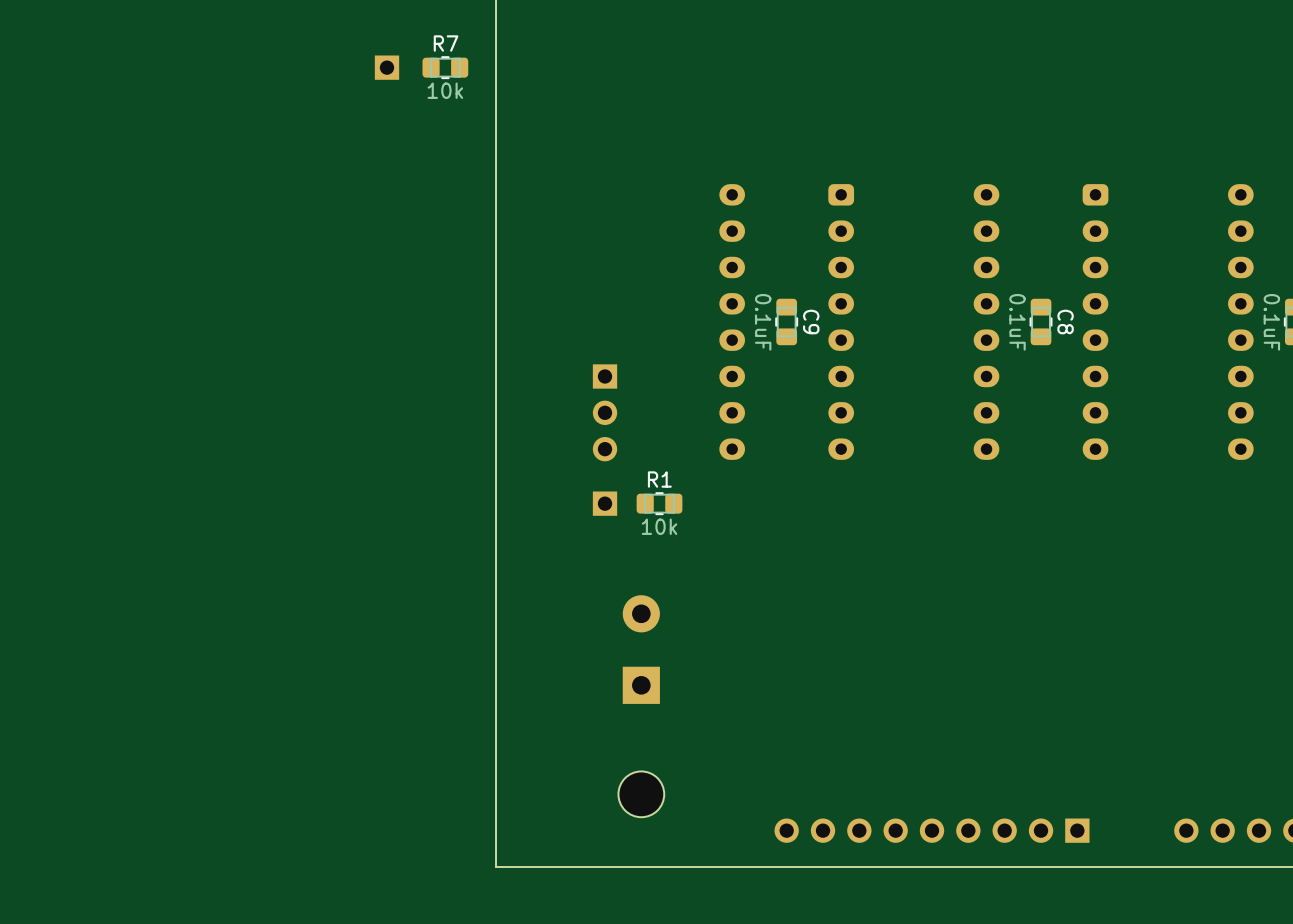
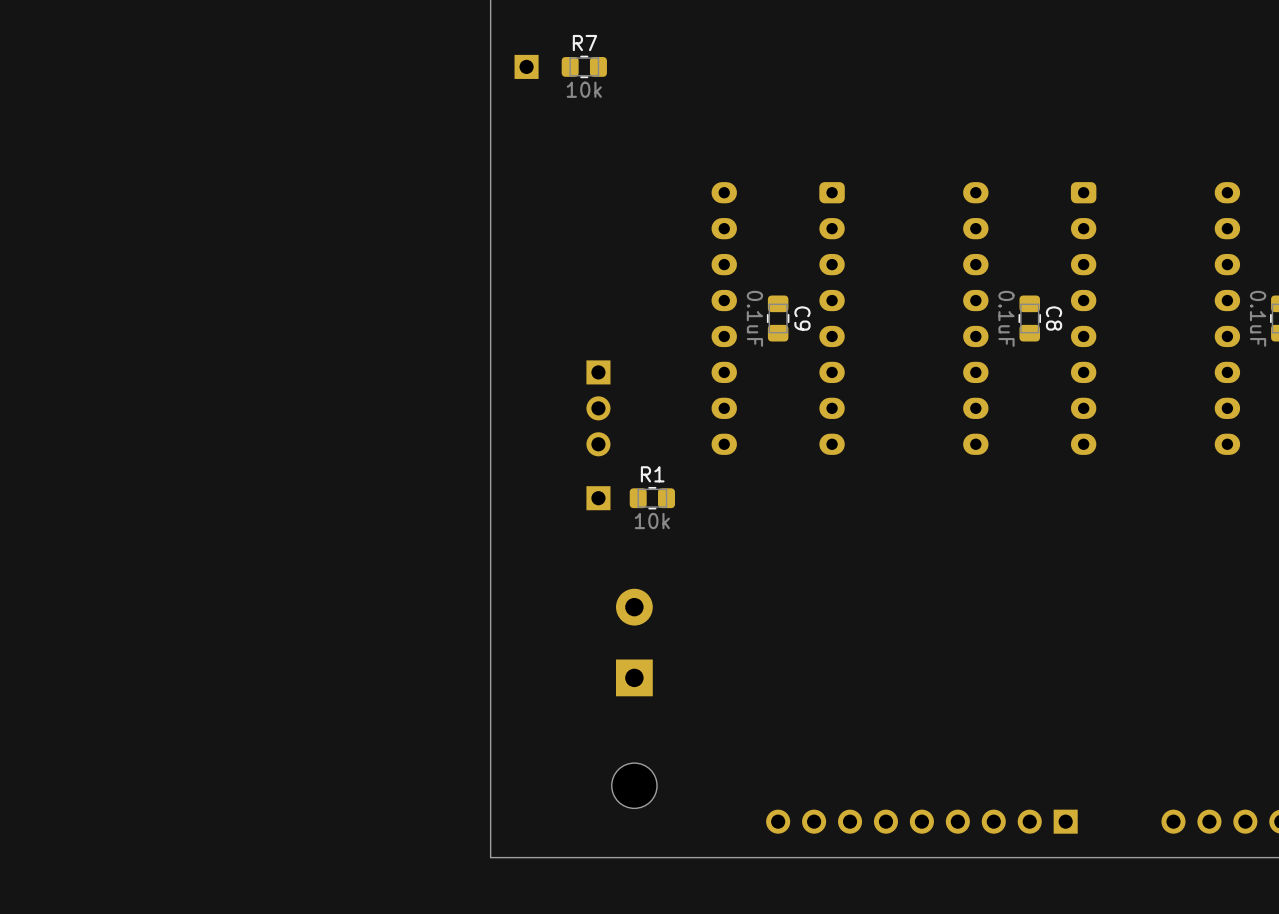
part position: (387, 67) -> (526, 66)
R7 position: (445, 67) -> (584, 66)

